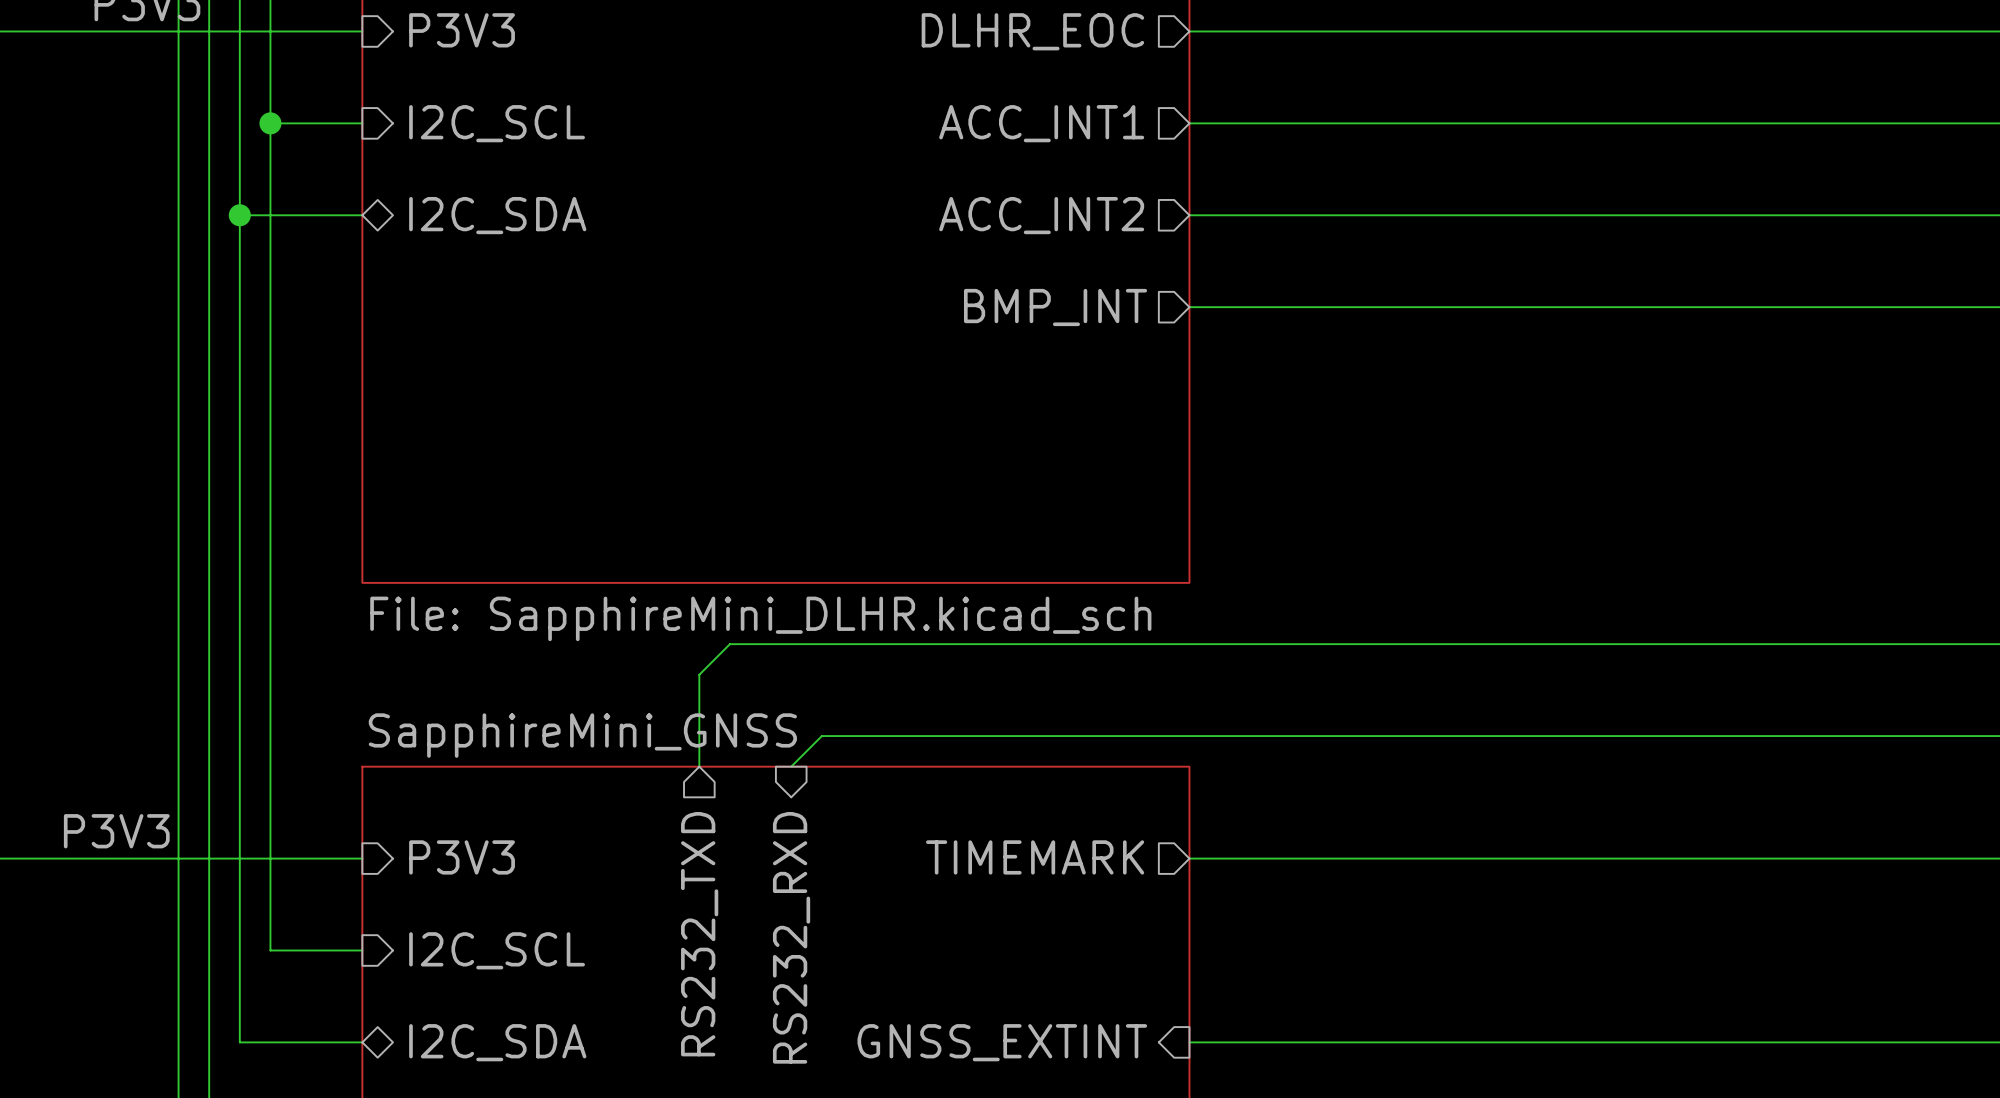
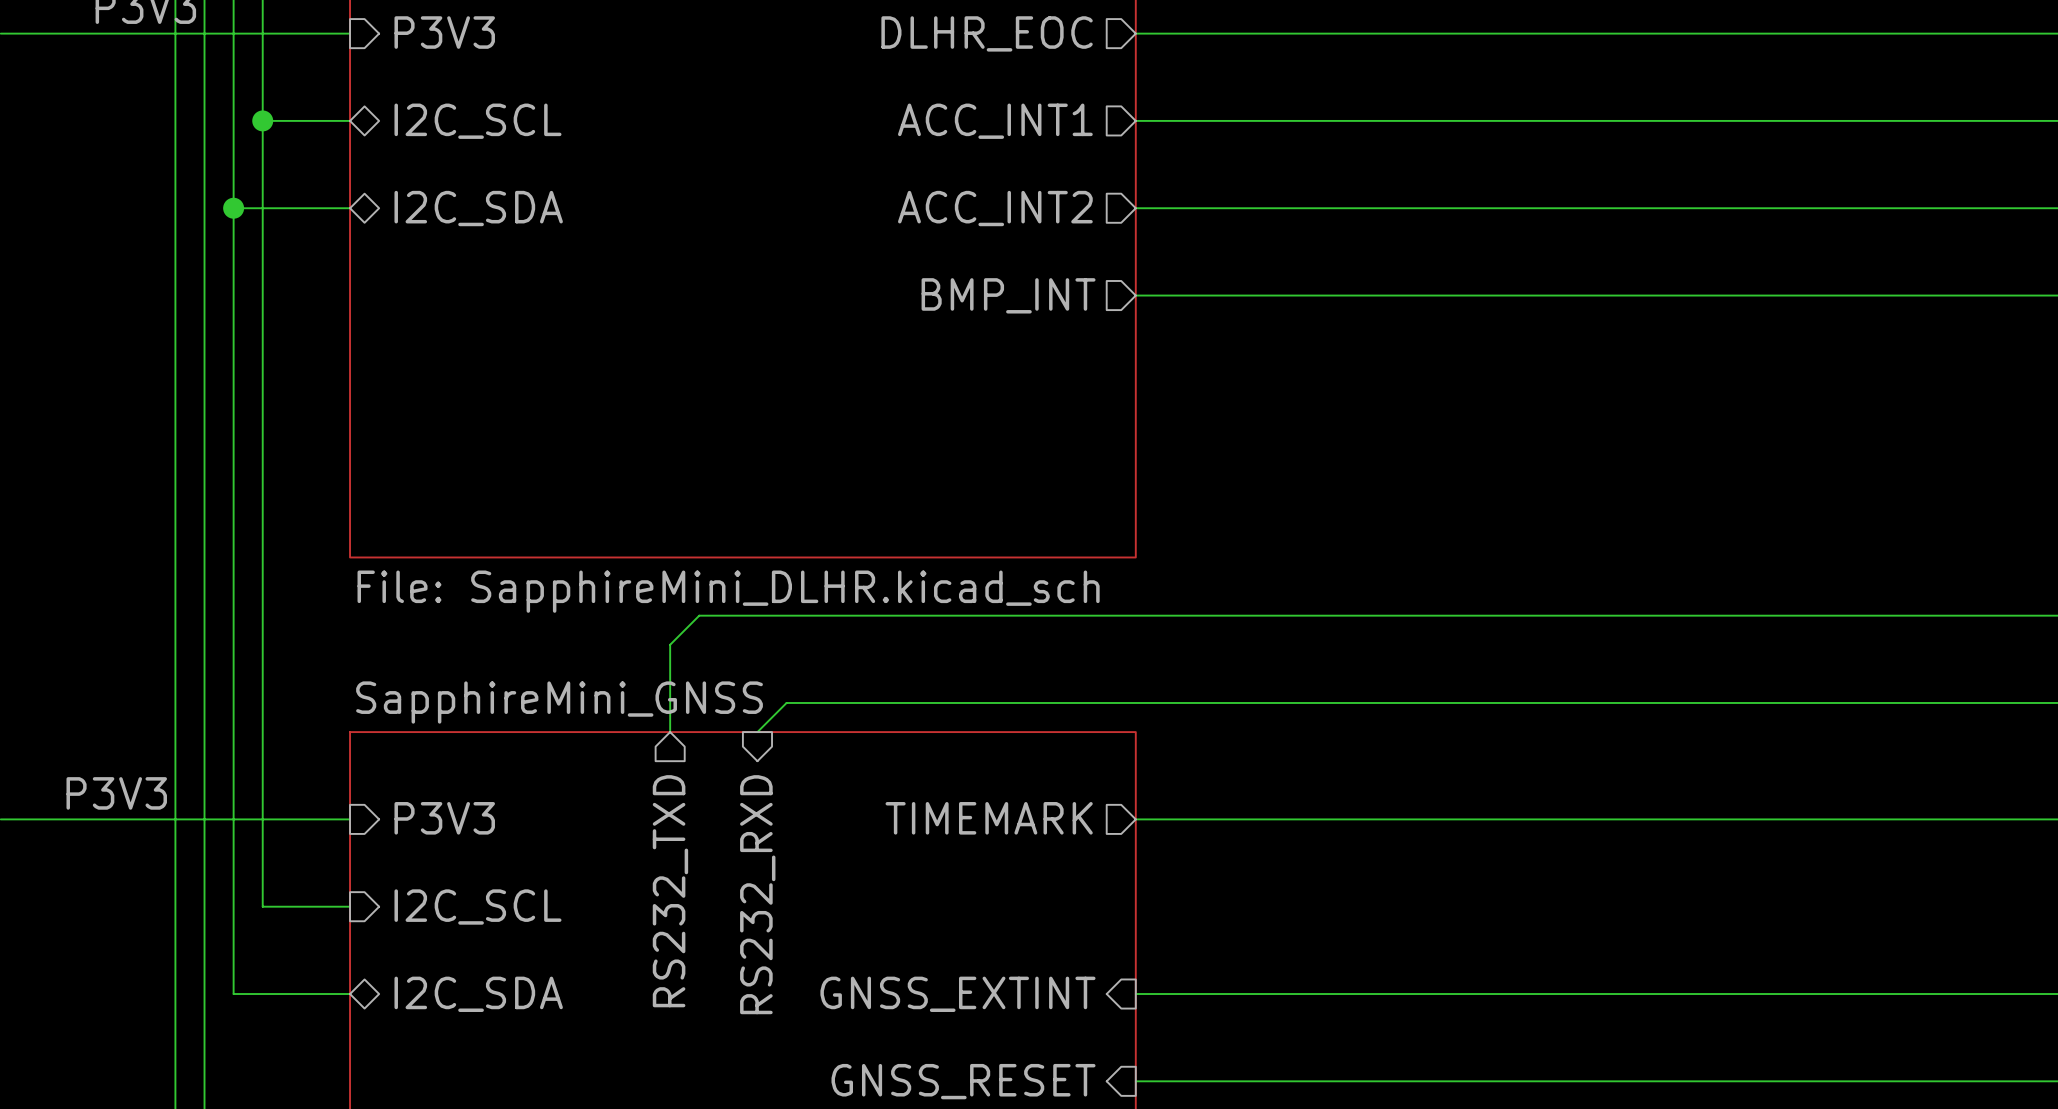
sheet pin shape: input (497, 123) -> bidirectional (477, 121)

